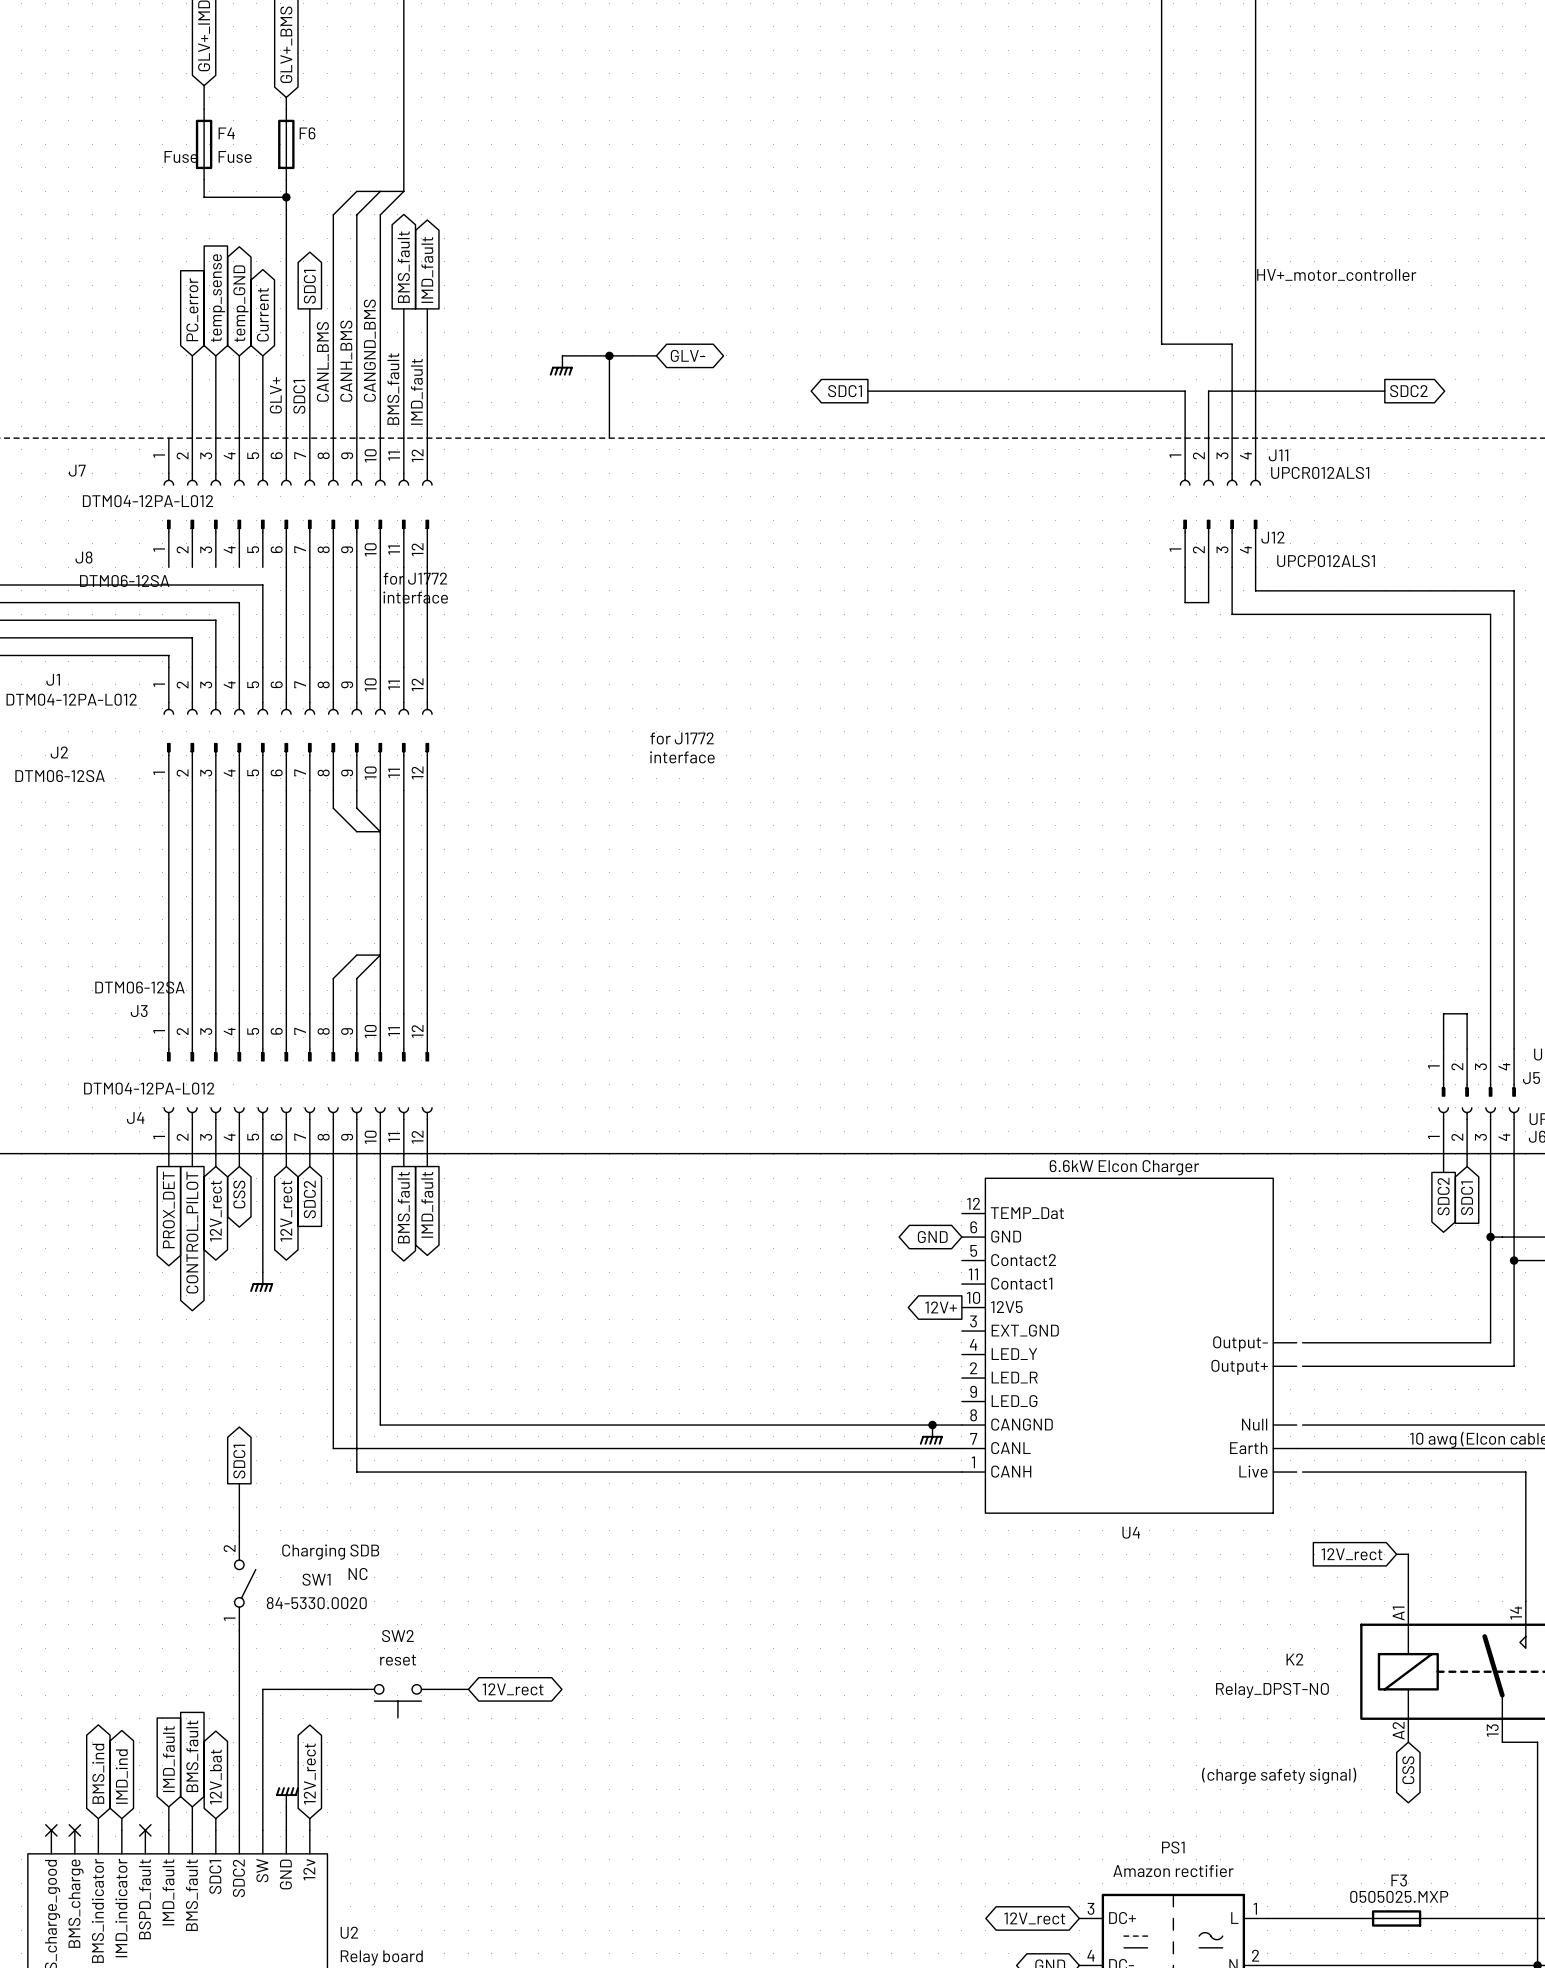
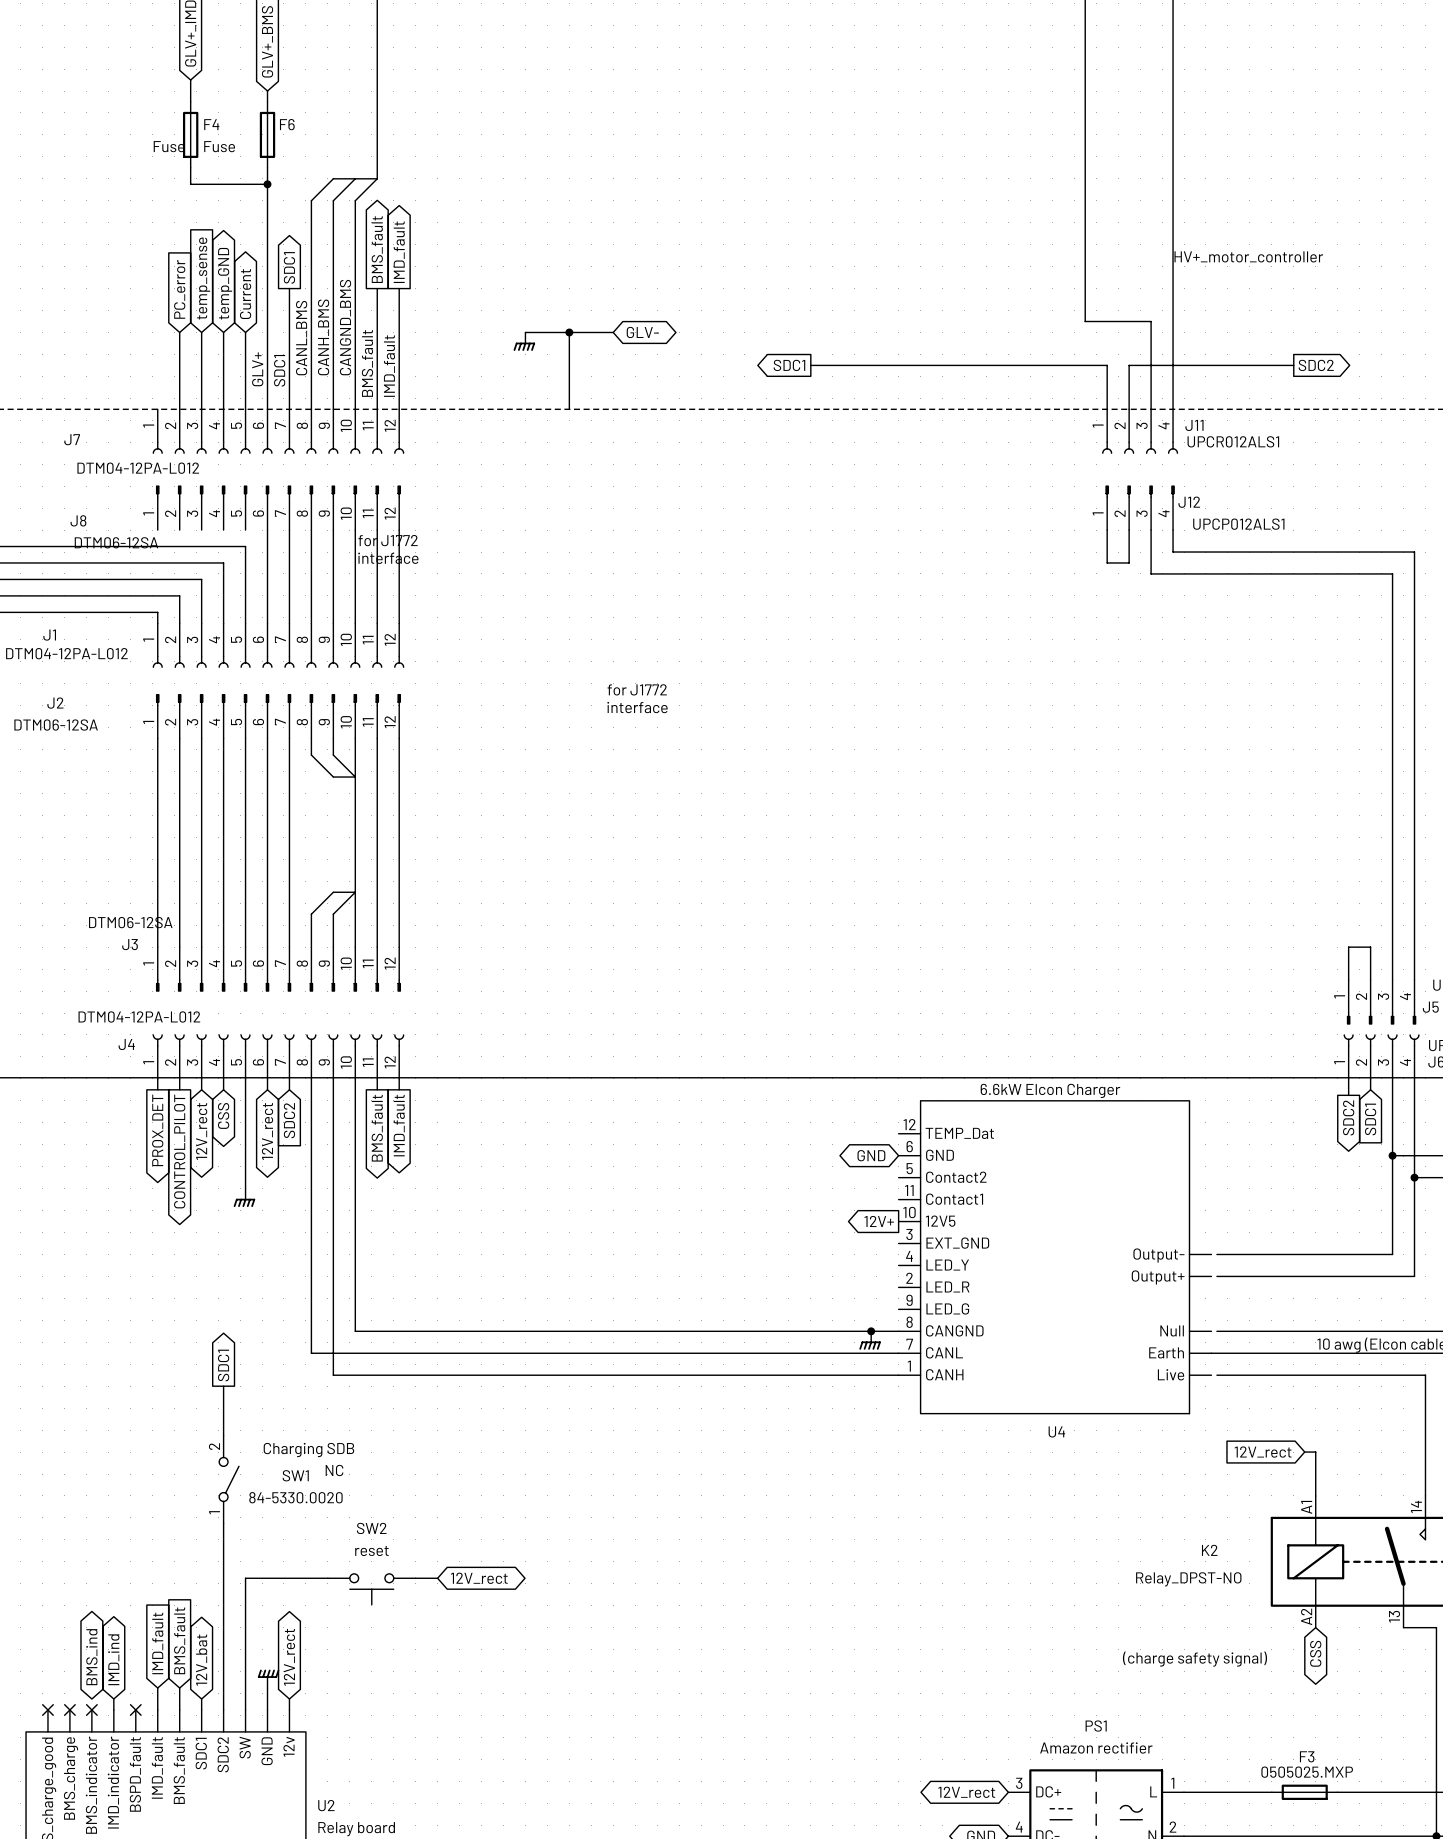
wire: (98, 1818) (98, 1830) -> none
no-connect mark: none -> (91, 1709)

